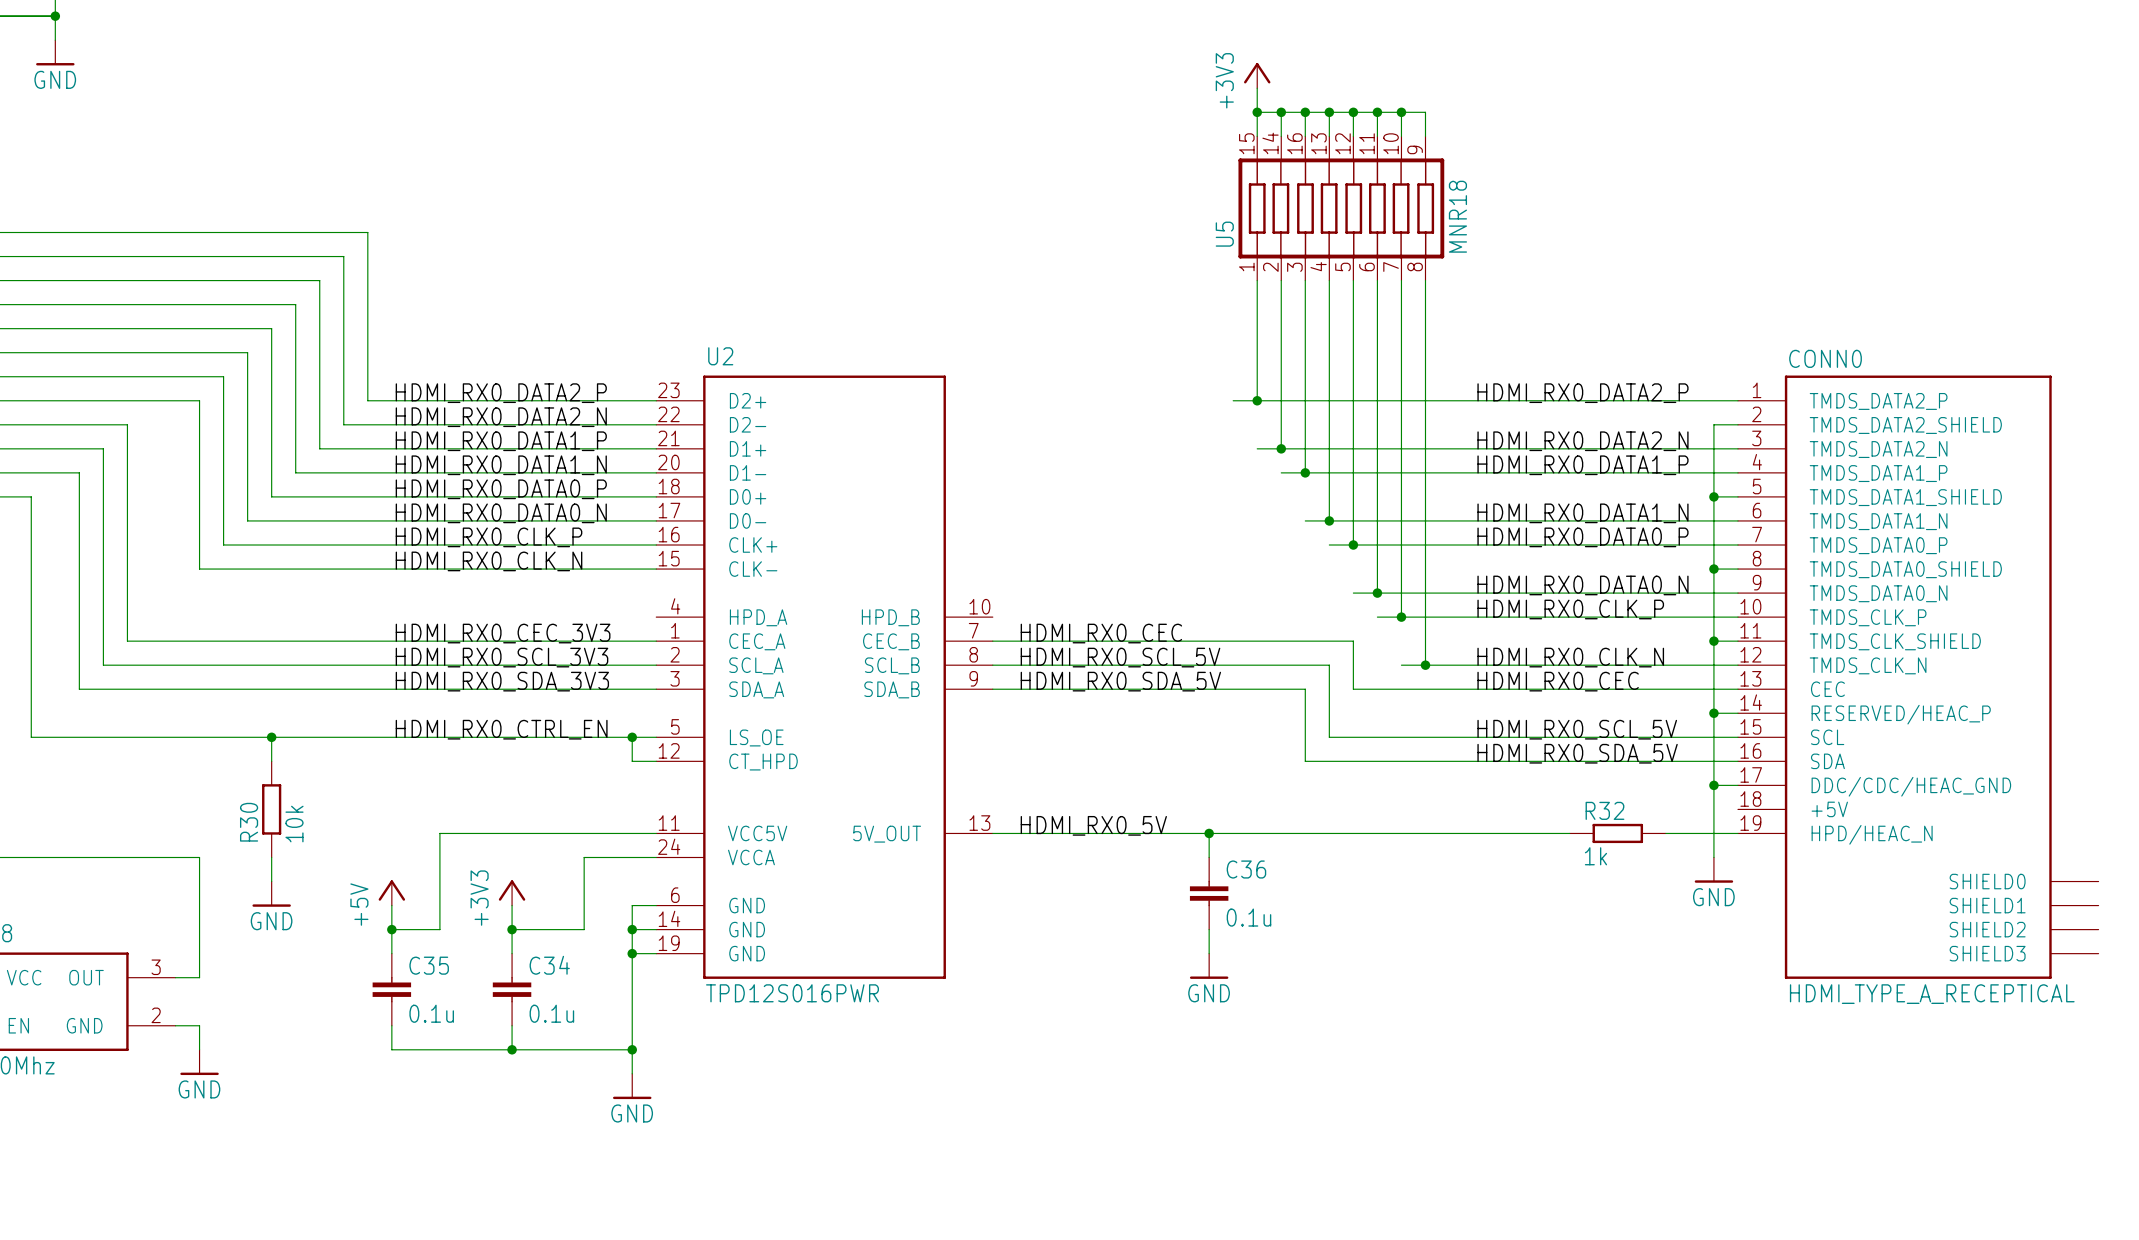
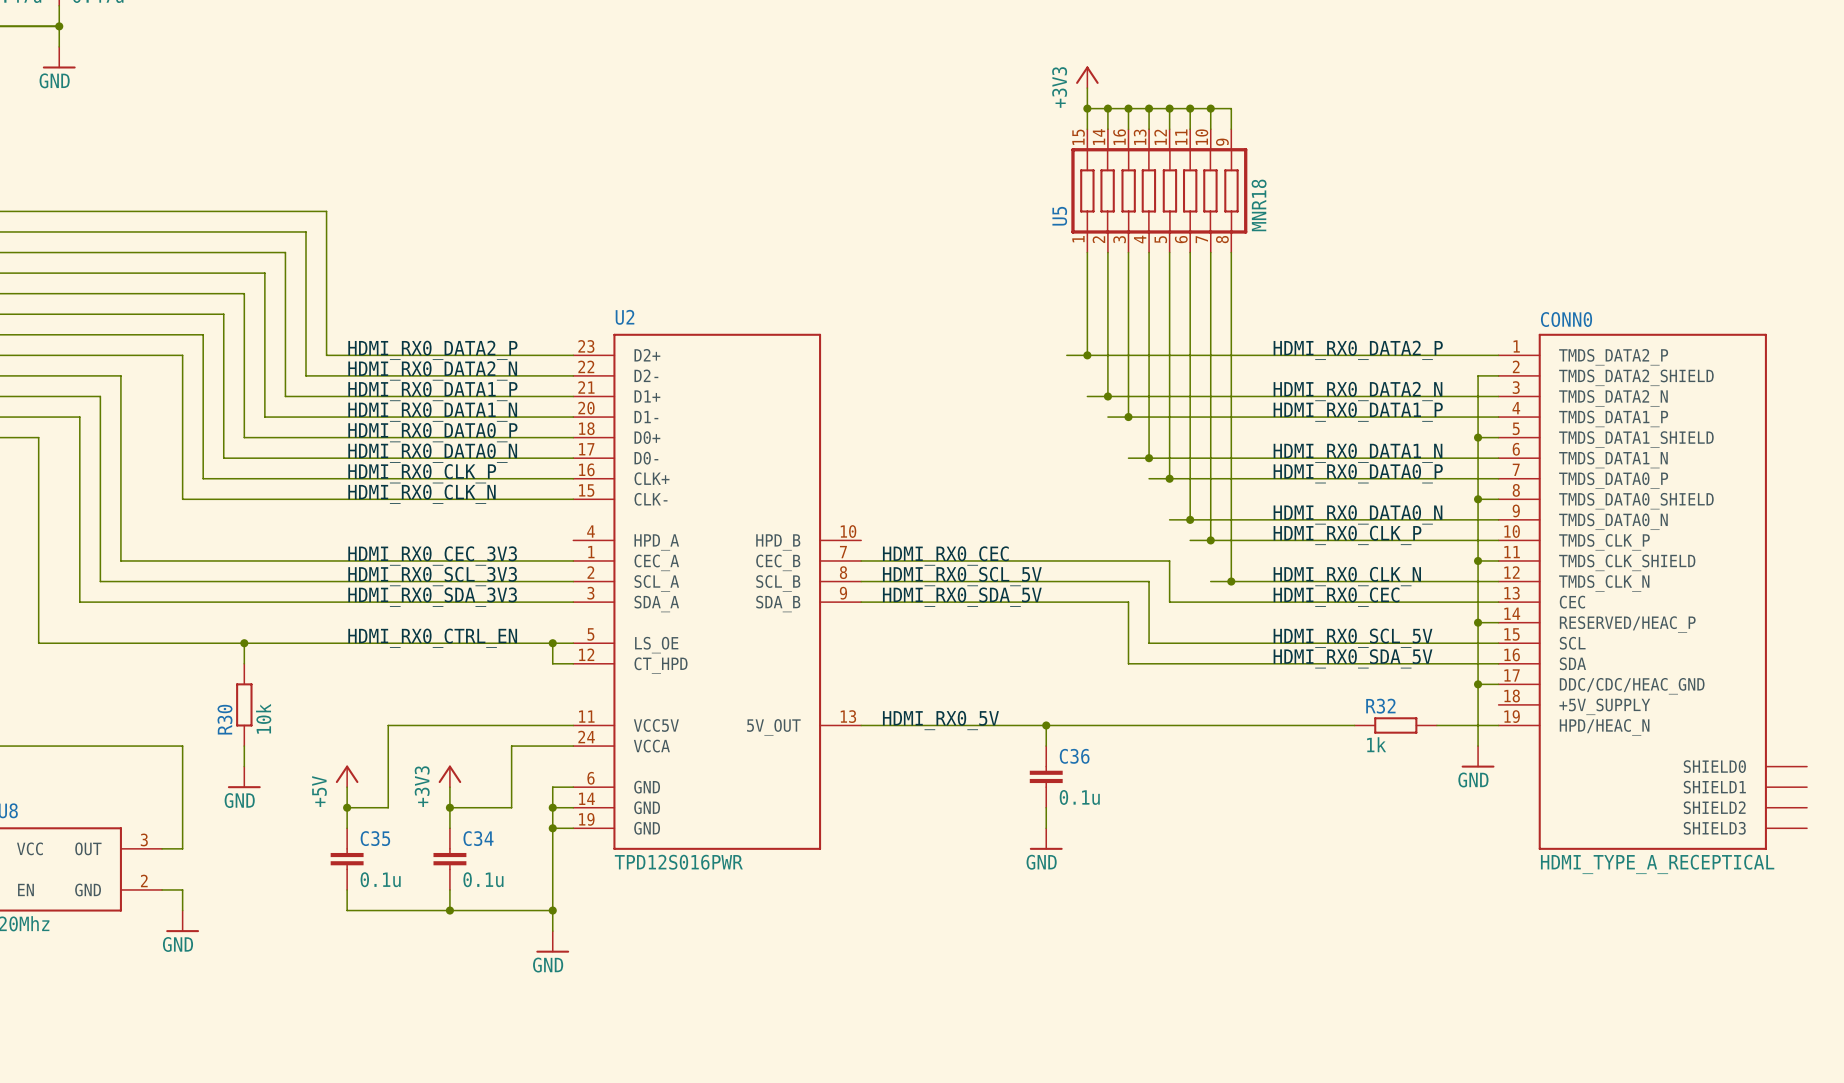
CONN0 pin name: +5V (1829, 809) -> +5V_SUPPLY (1604, 706)

